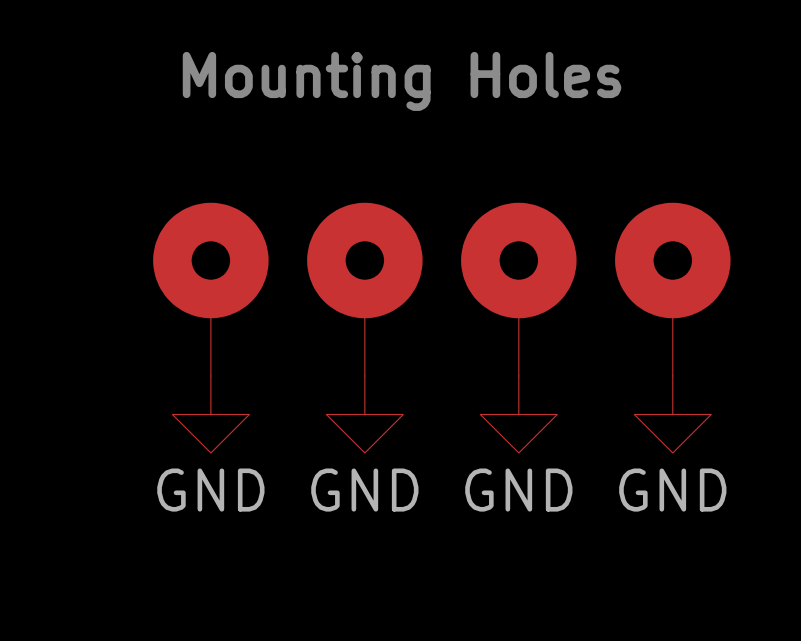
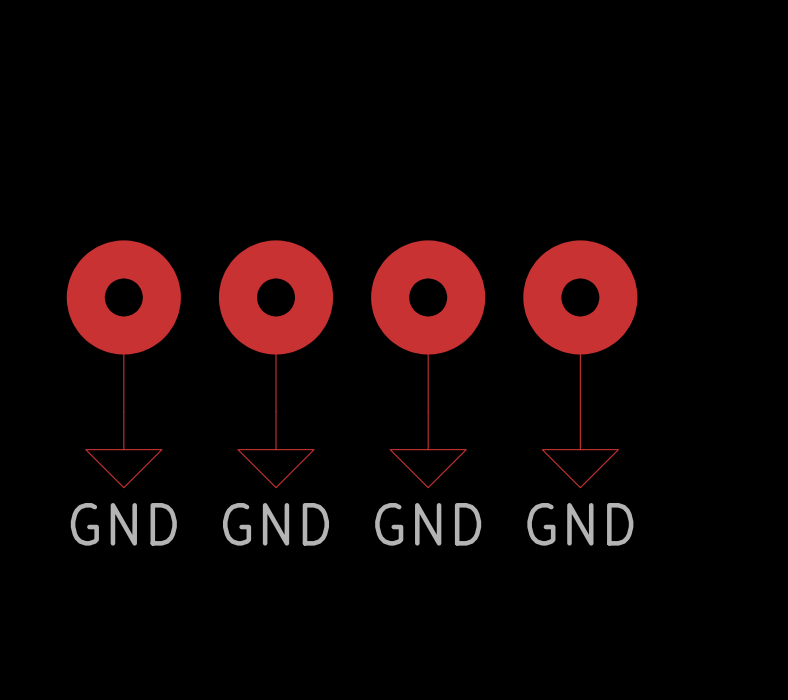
text: Mounting Holes (401, 81) -> none

